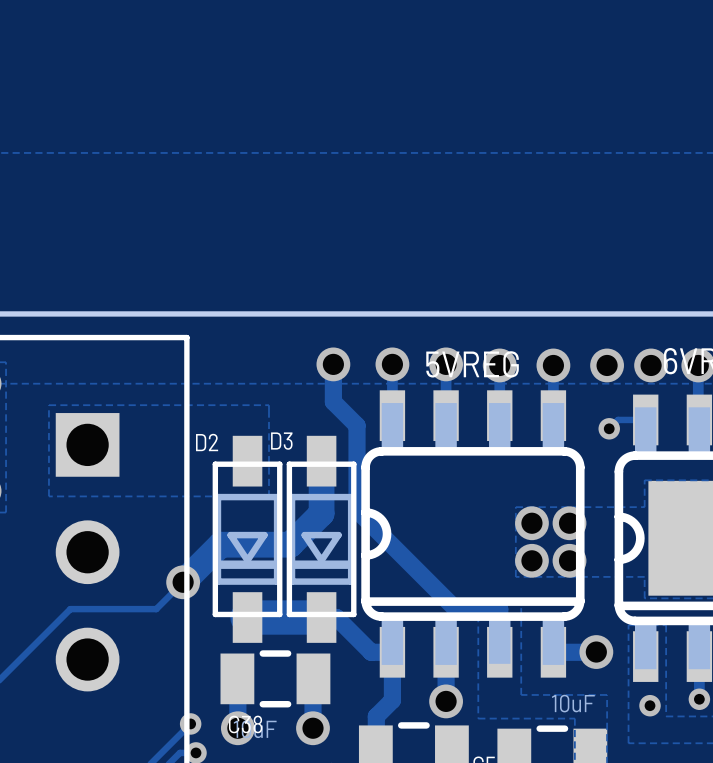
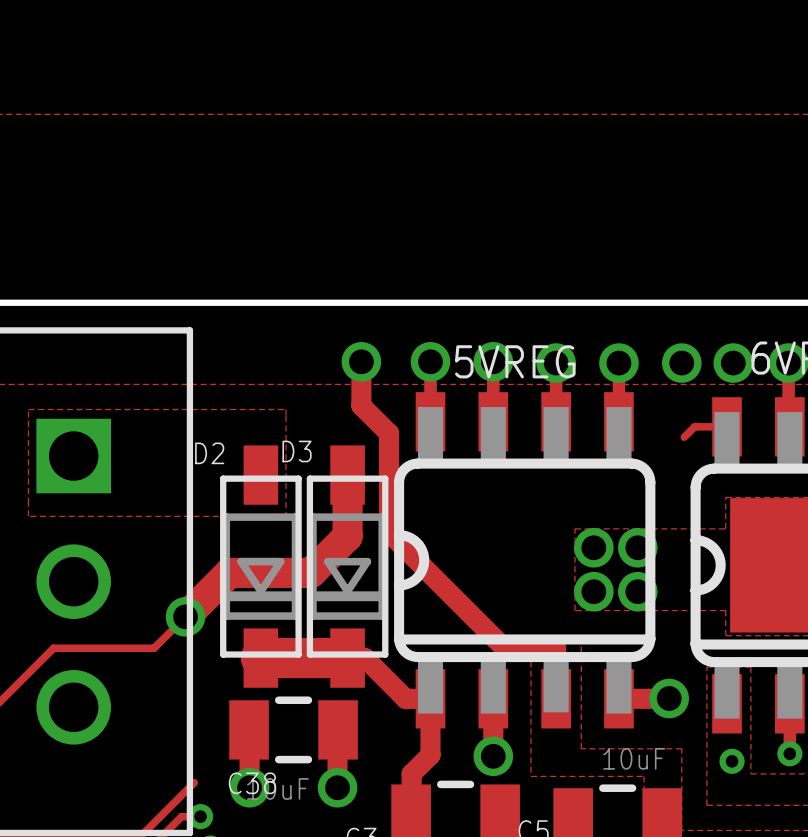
via: (609, 428) -> none
via: (190, 723) -> none

